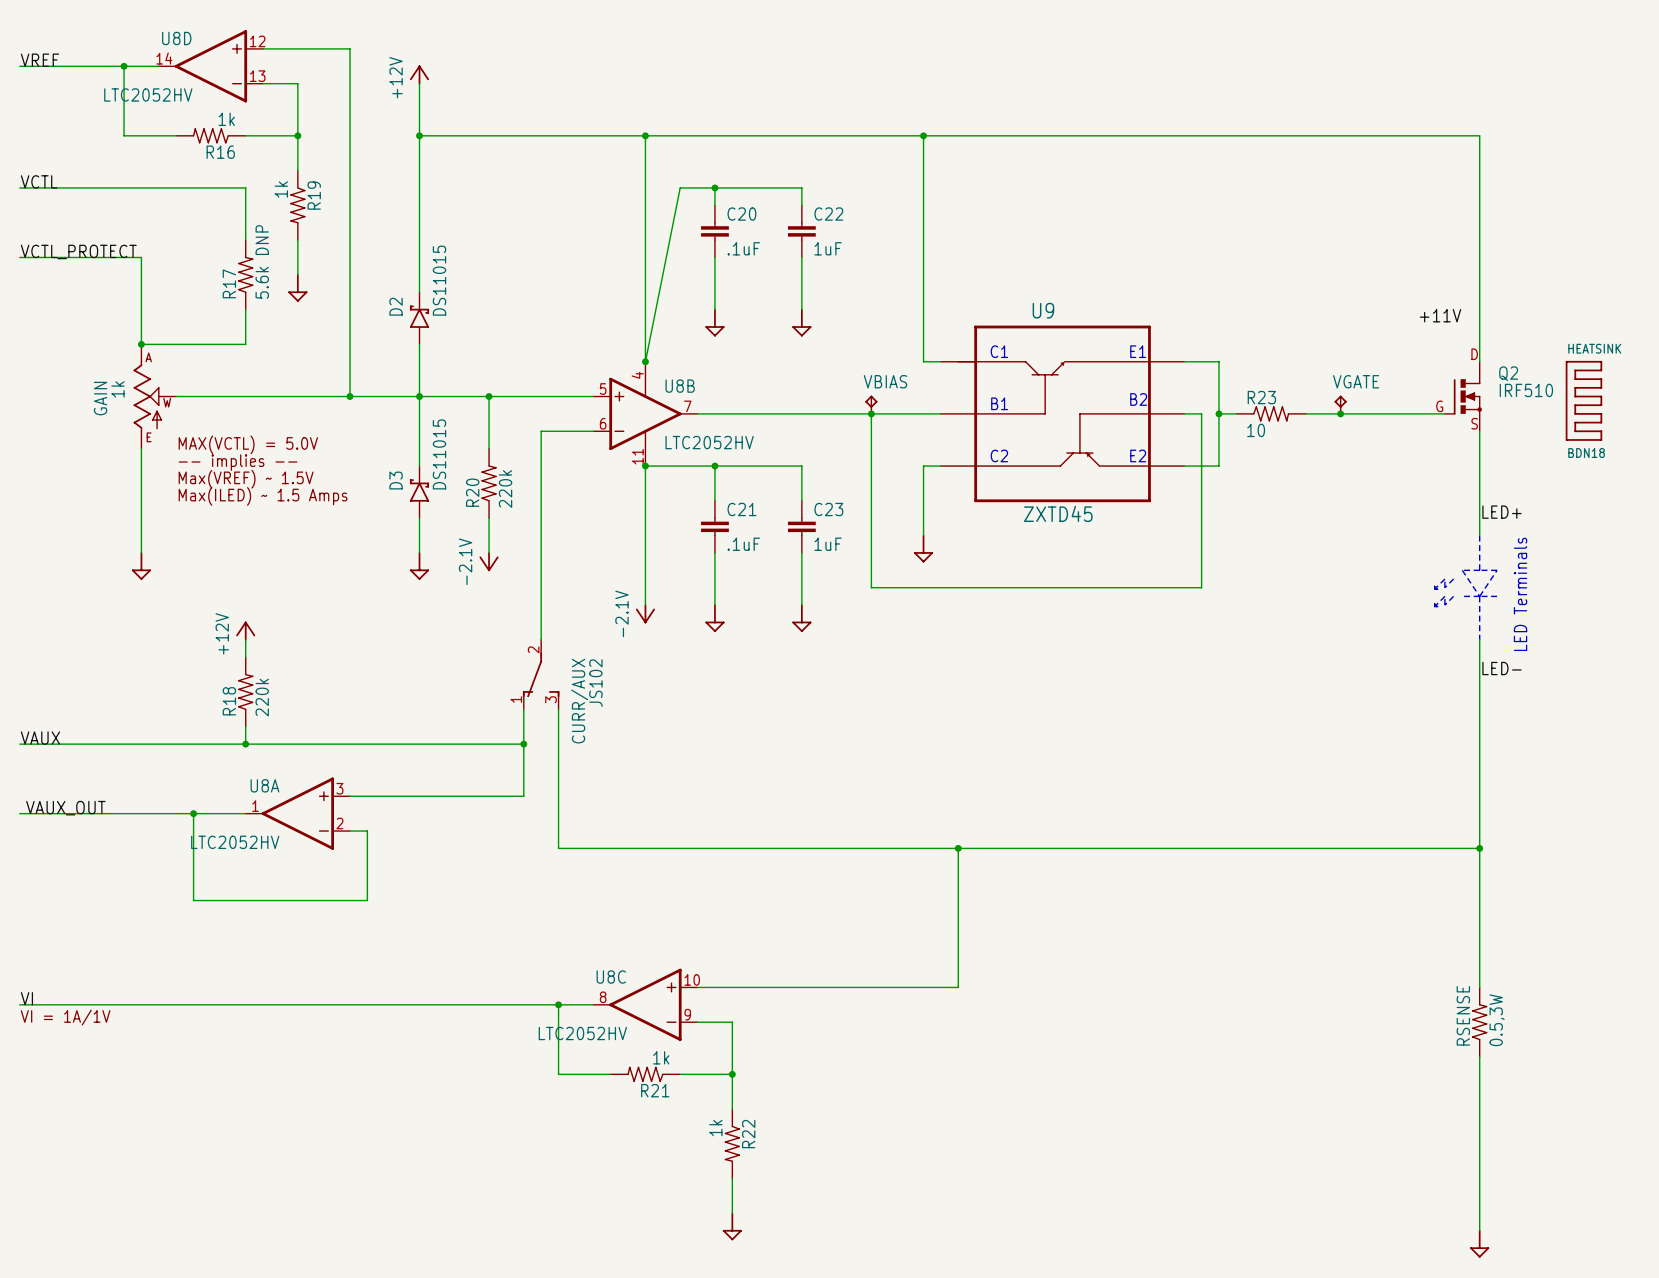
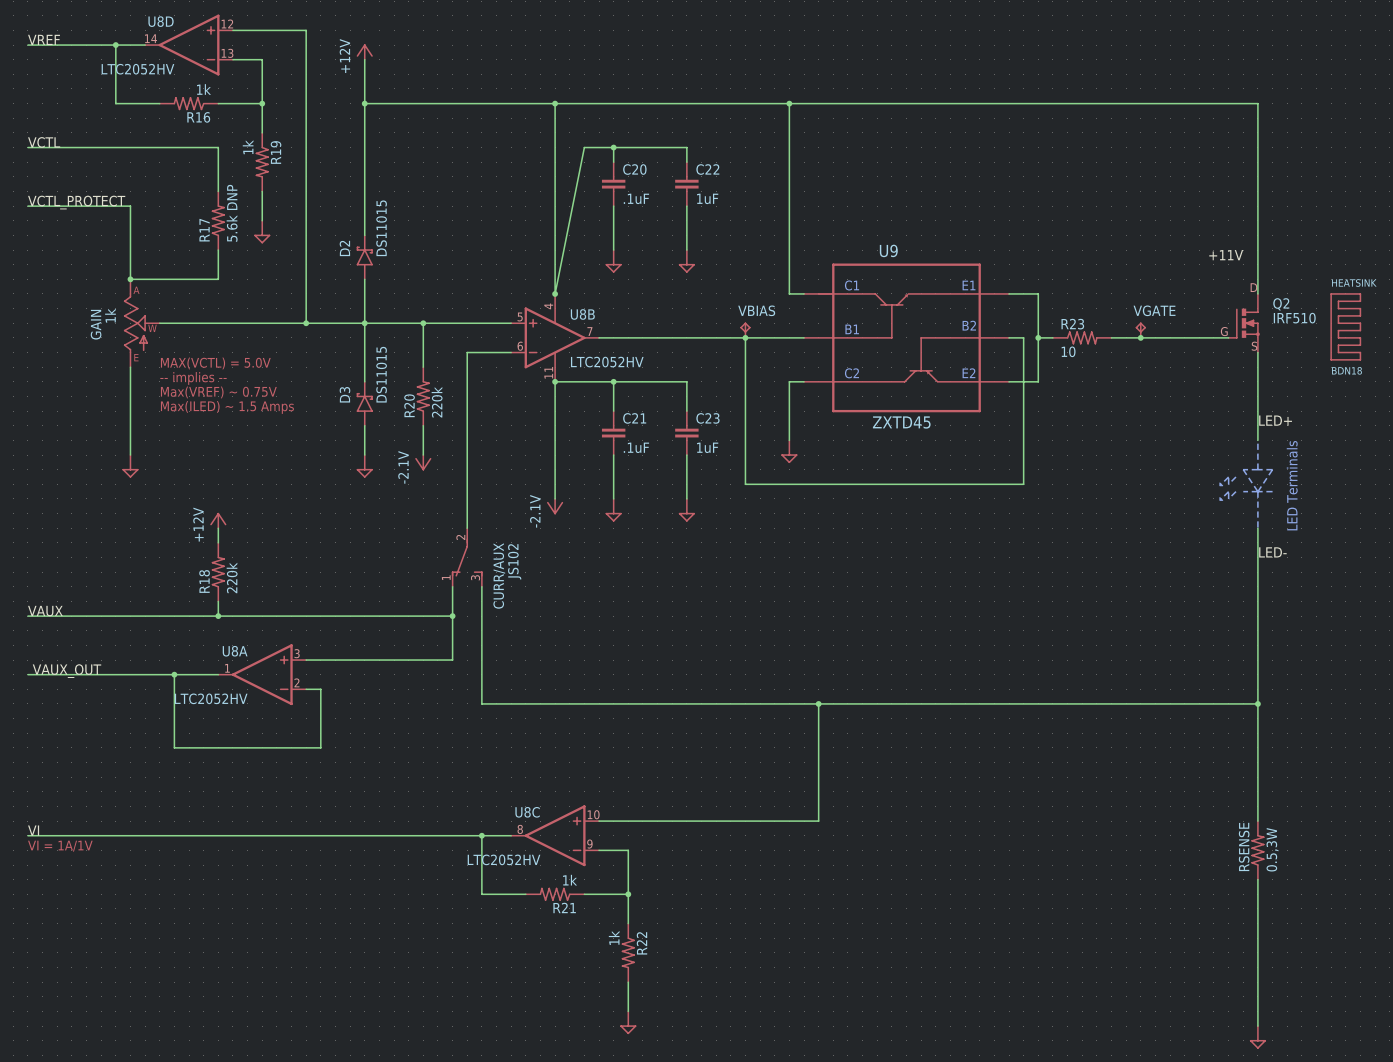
text: Max(VREF) ~ 1.5V (246, 479) -> Max(VREF) ~ 0.75V (218, 392)

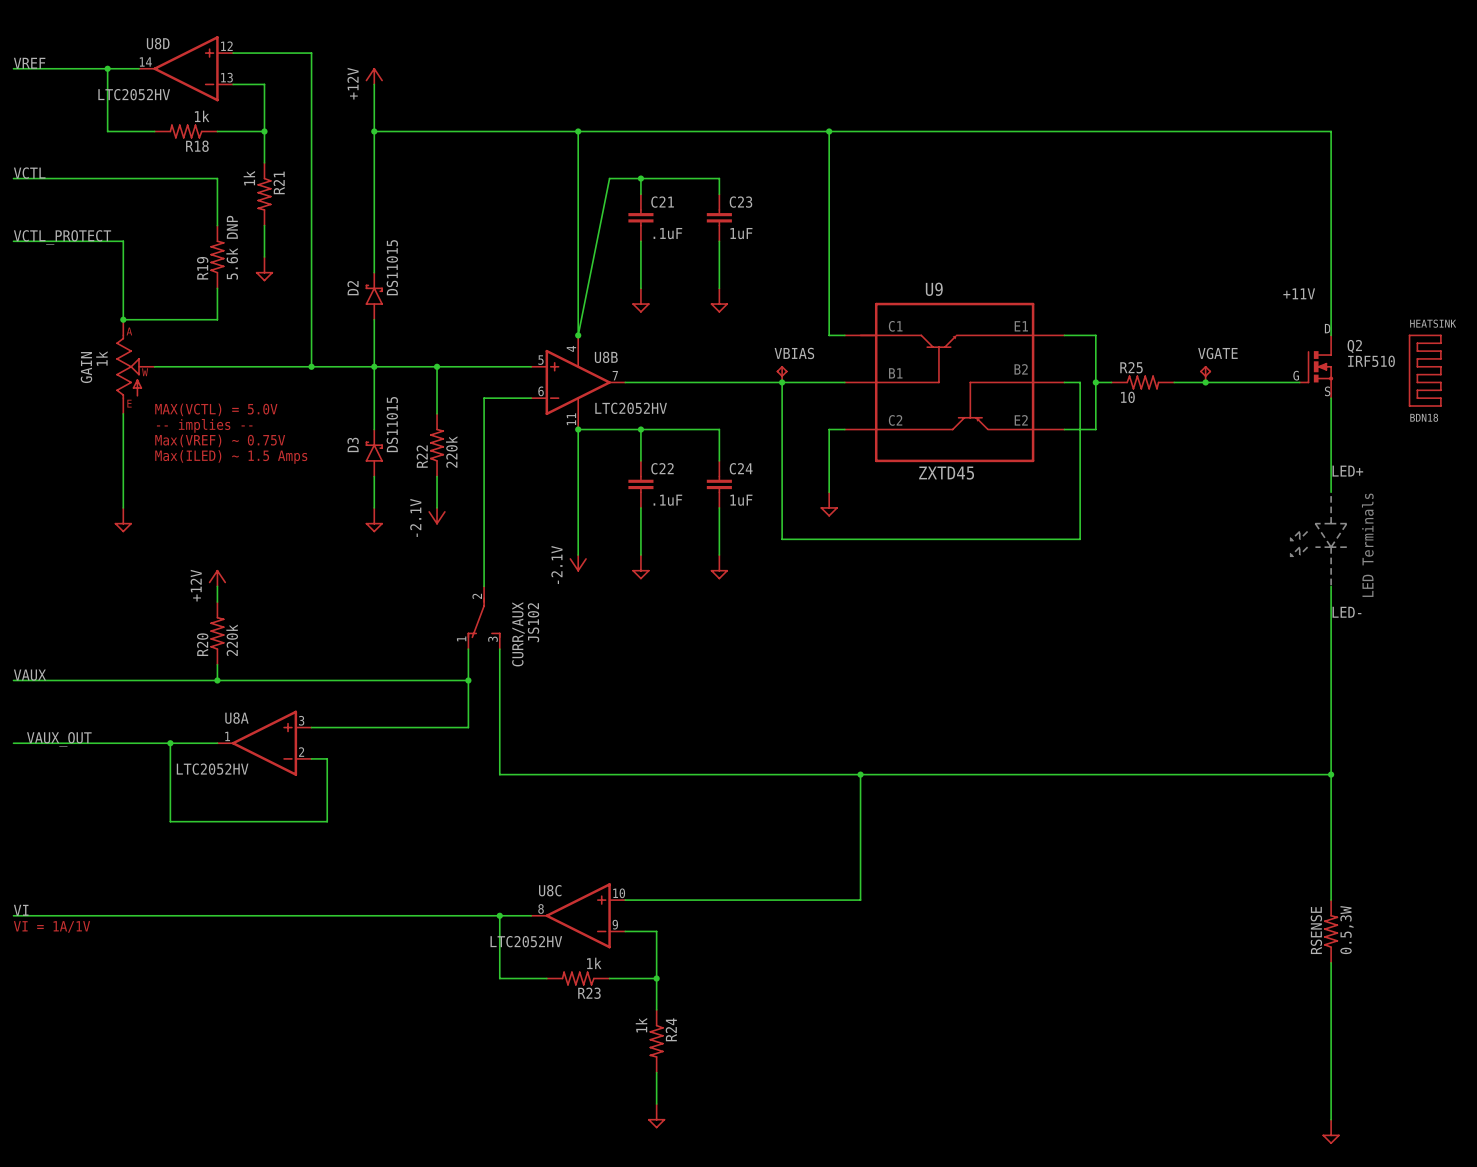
R16 name: R16 (198, 117) -> R18 (197, 146)
R19 name: R19 (276, 152) -> R21 (279, 182)
C20 name: C20 (634, 169) -> C21 (662, 202)
C22 name: C22 (707, 169) -> C23 (740, 202)
R17 name: R17 (204, 230) -> R19 (202, 268)
R23 name: R23 (1072, 324) -> R25 (1131, 367)
R20 name: R20 (409, 405) -> R22 (422, 456)
C21 name: C21 (634, 418) -> C22 (662, 468)
C23 name: C23 (707, 418) -> C24 (741, 468)
R18 name: R18 (204, 581) -> R20 (202, 644)
R21 name: R21 (564, 907) -> R23 (589, 993)
R22 name: R22 (641, 943) -> R24 (671, 1029)

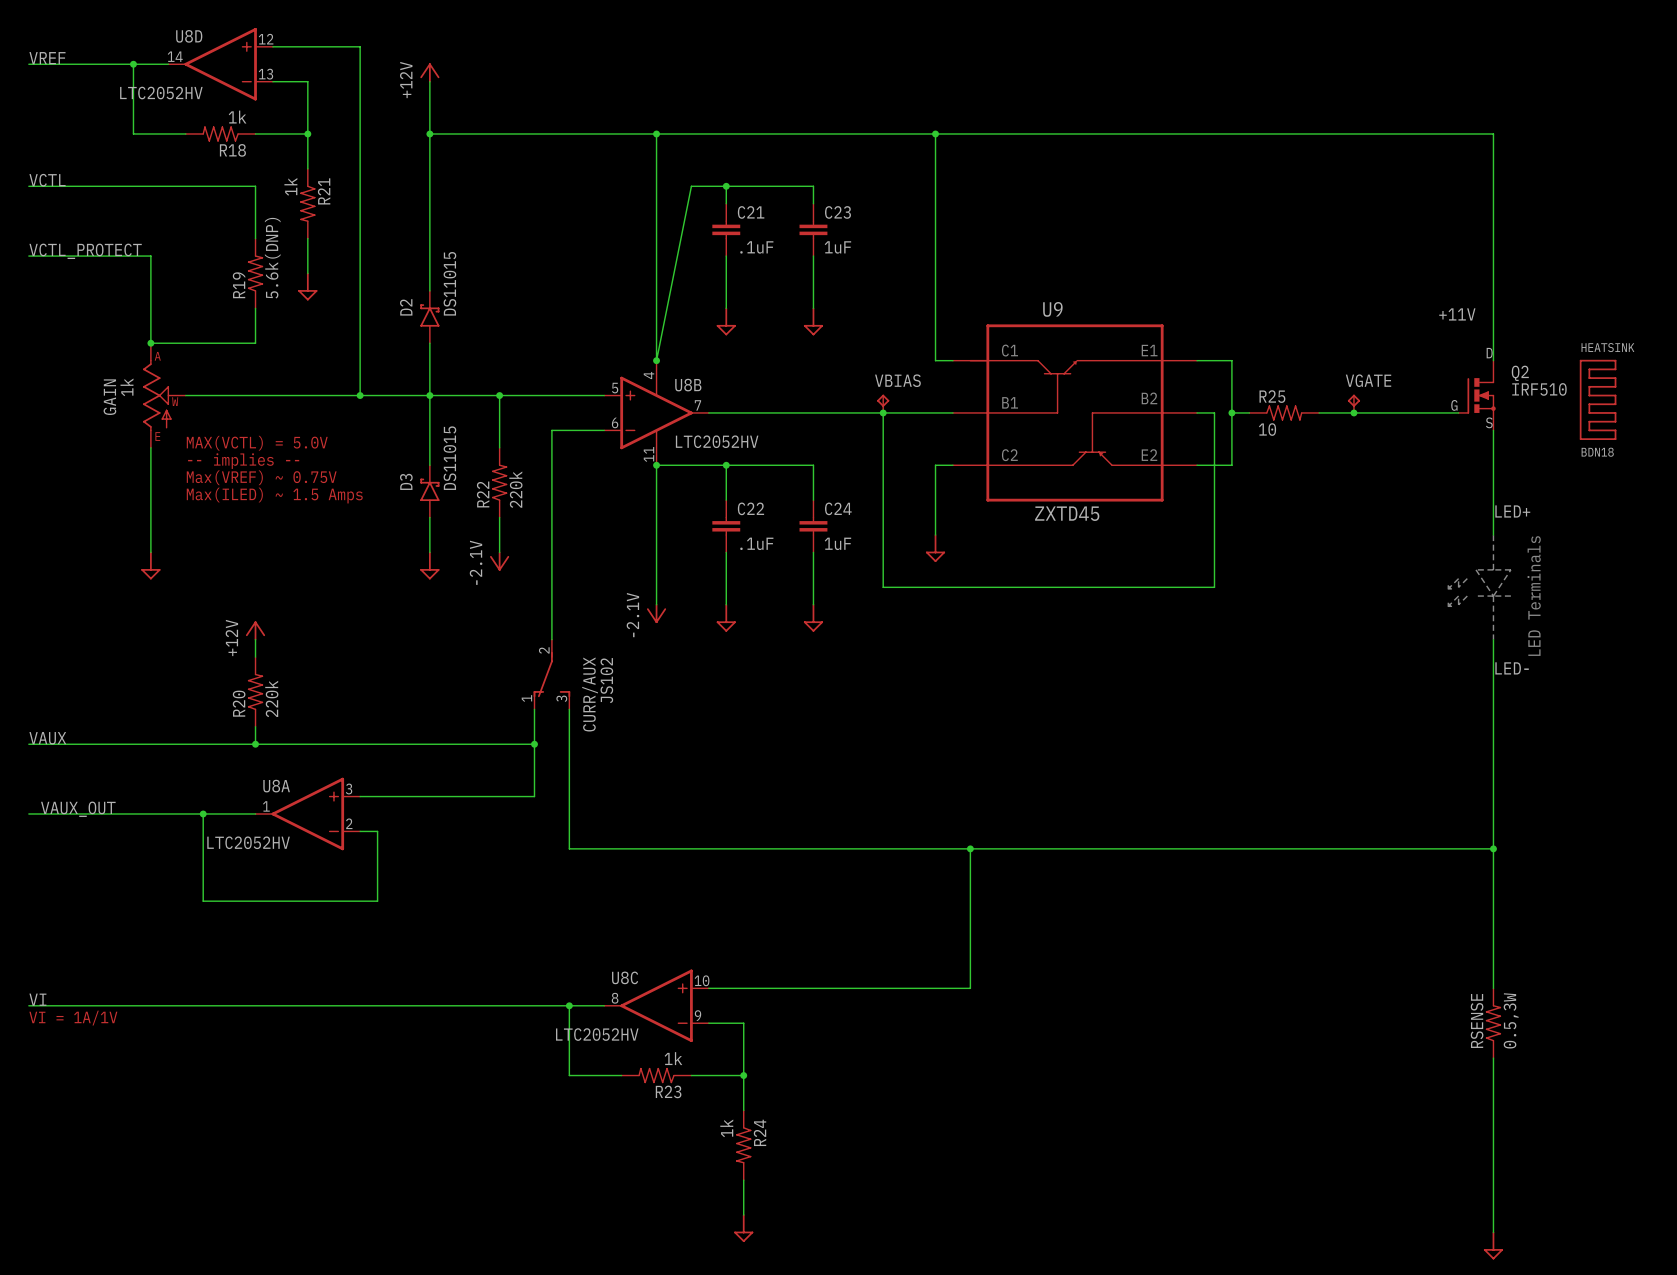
R19 value: 5.6k DNP (232, 247) -> 5.6k(DNP) (272, 258)

